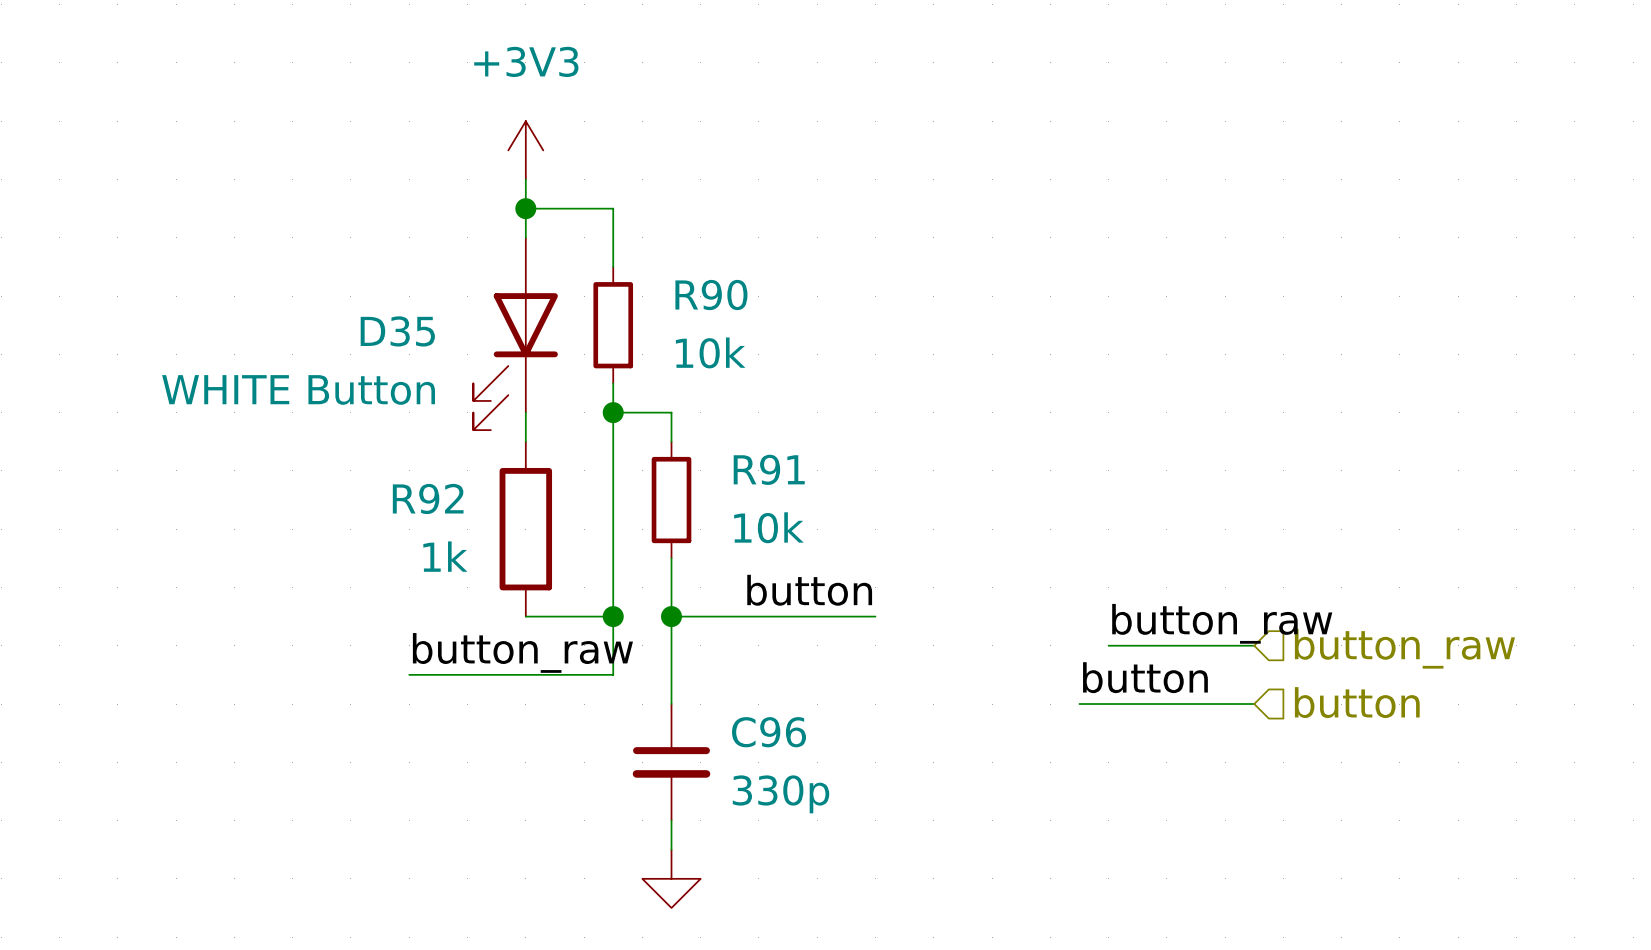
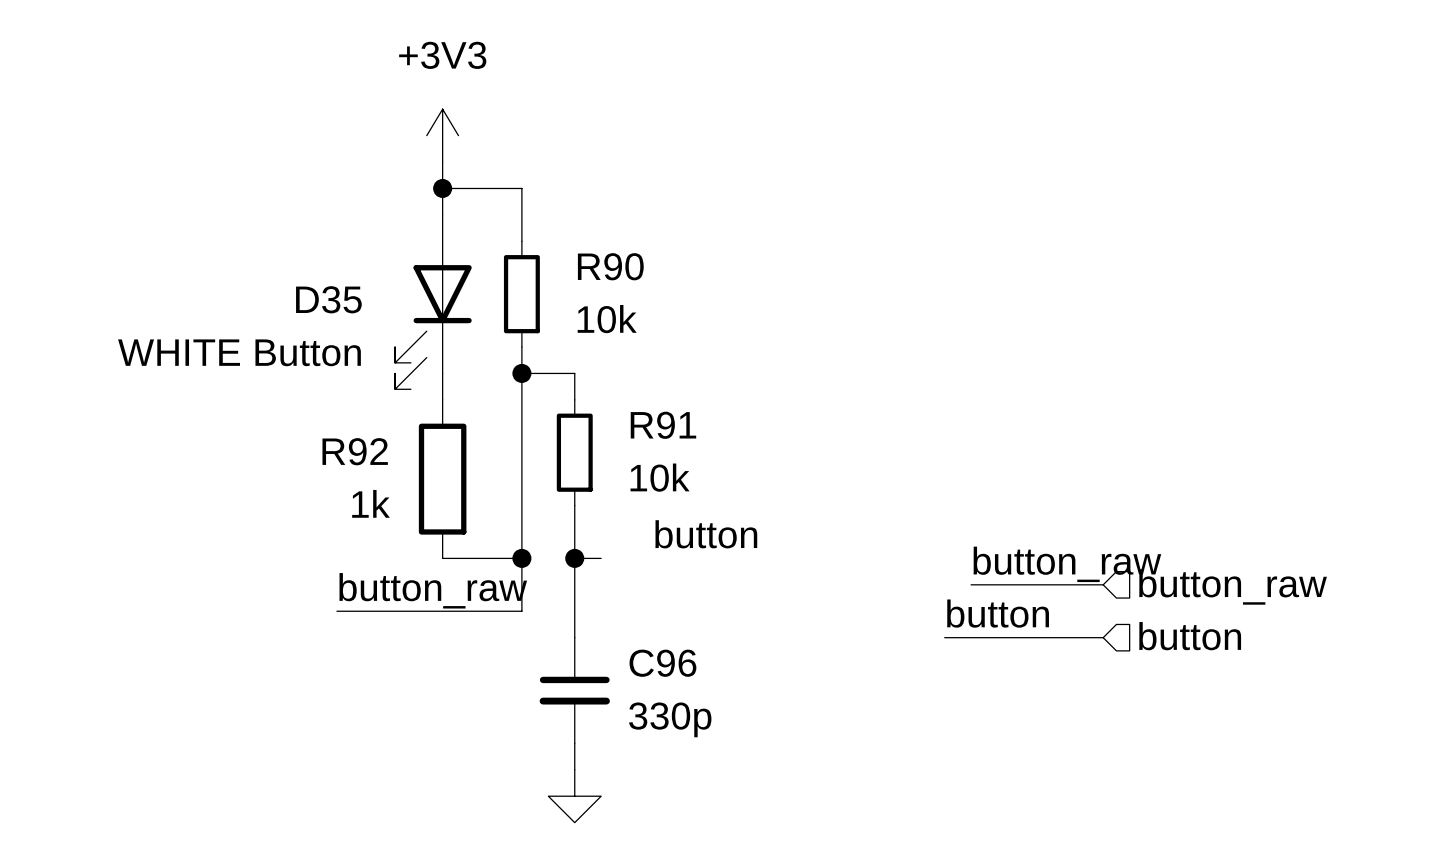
wire: (700, 616) (875, 616) -> none

